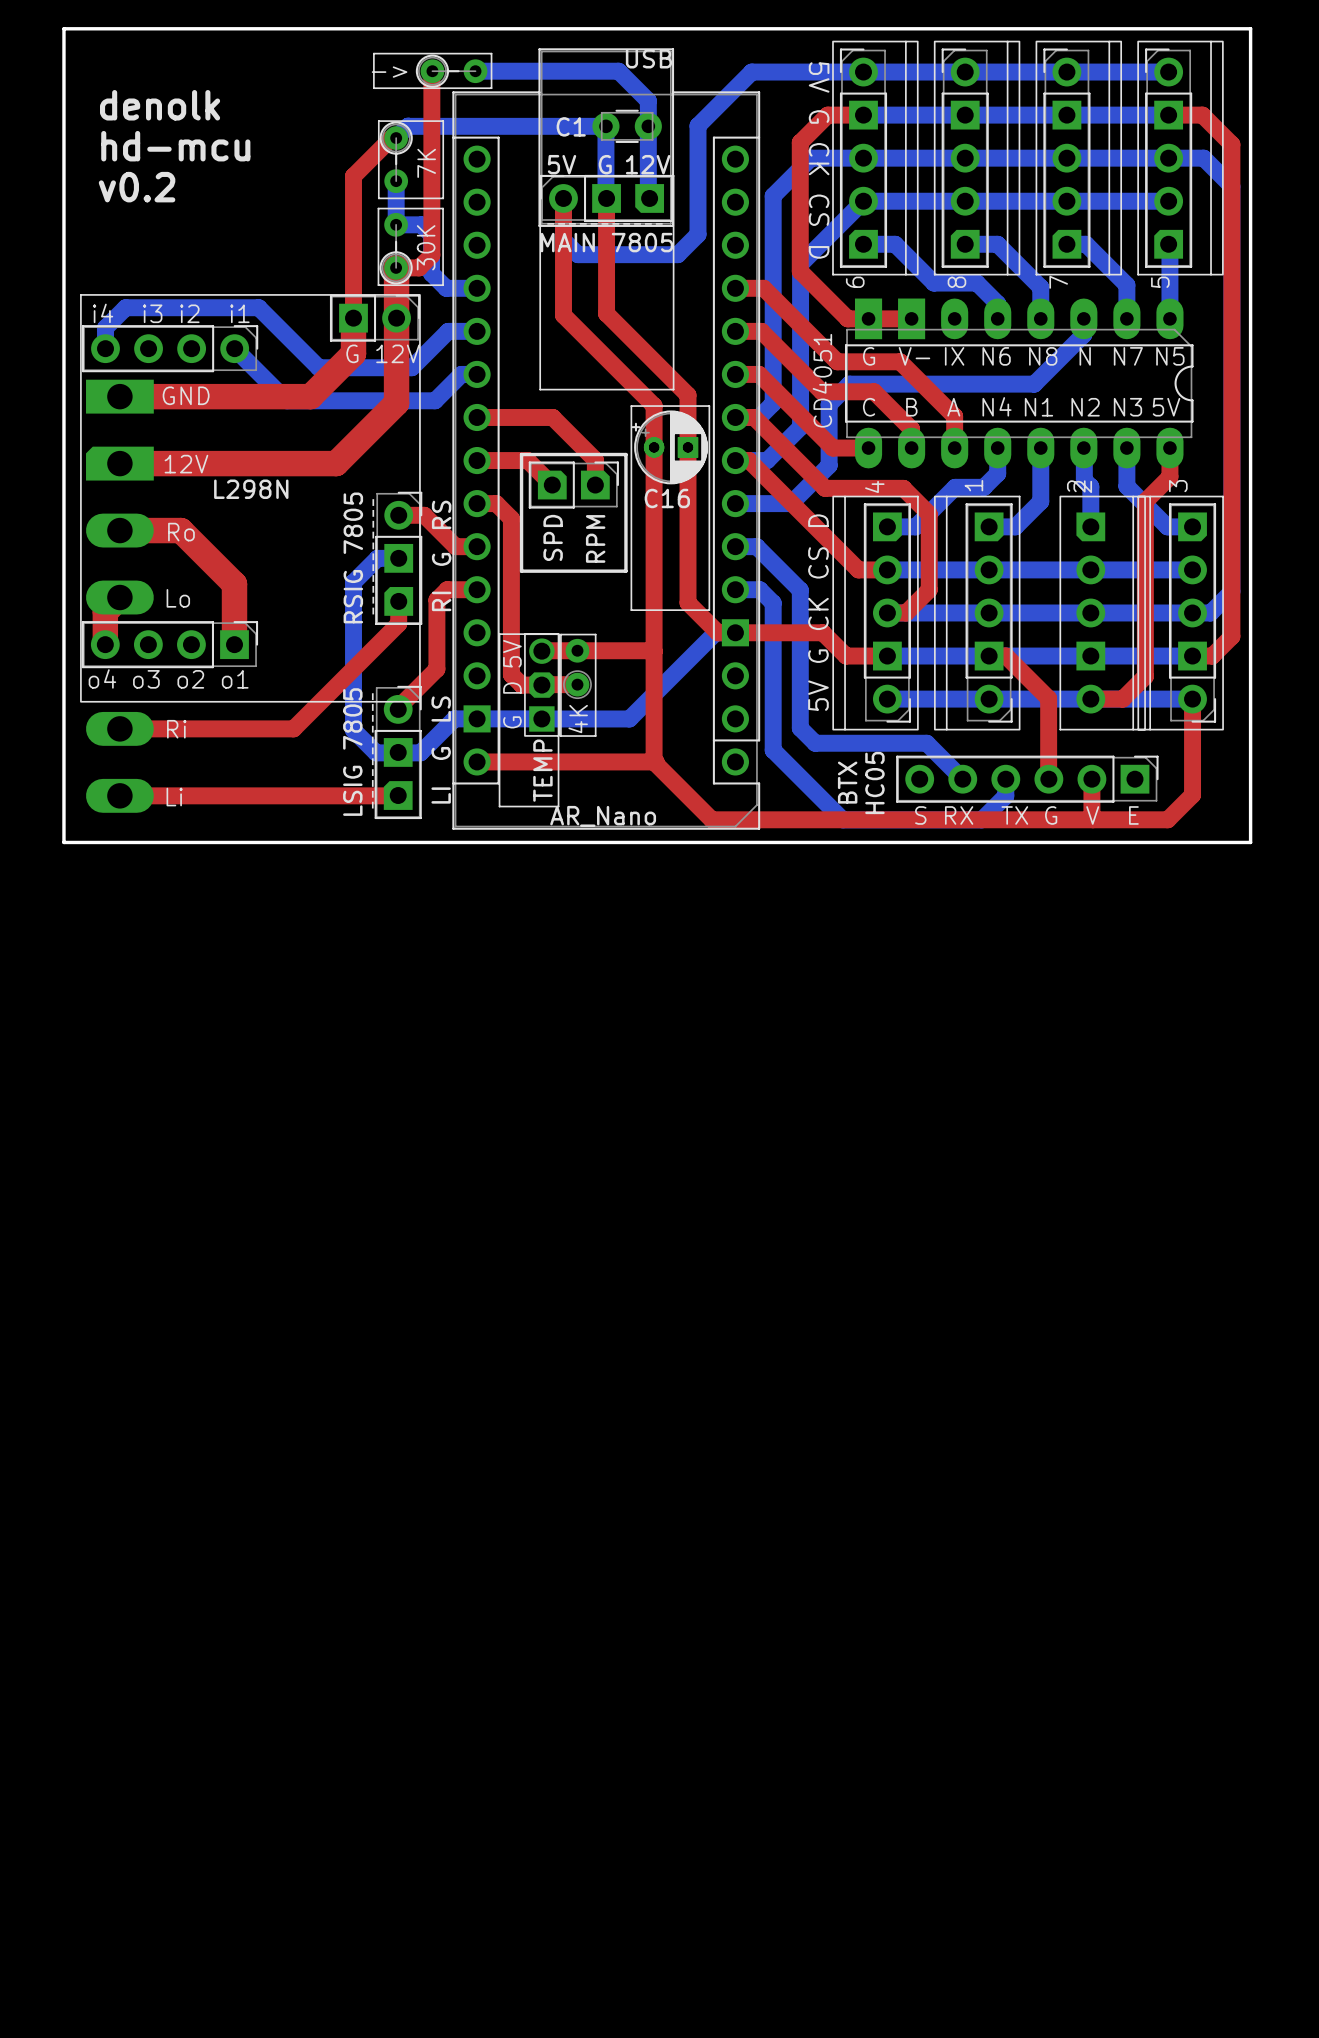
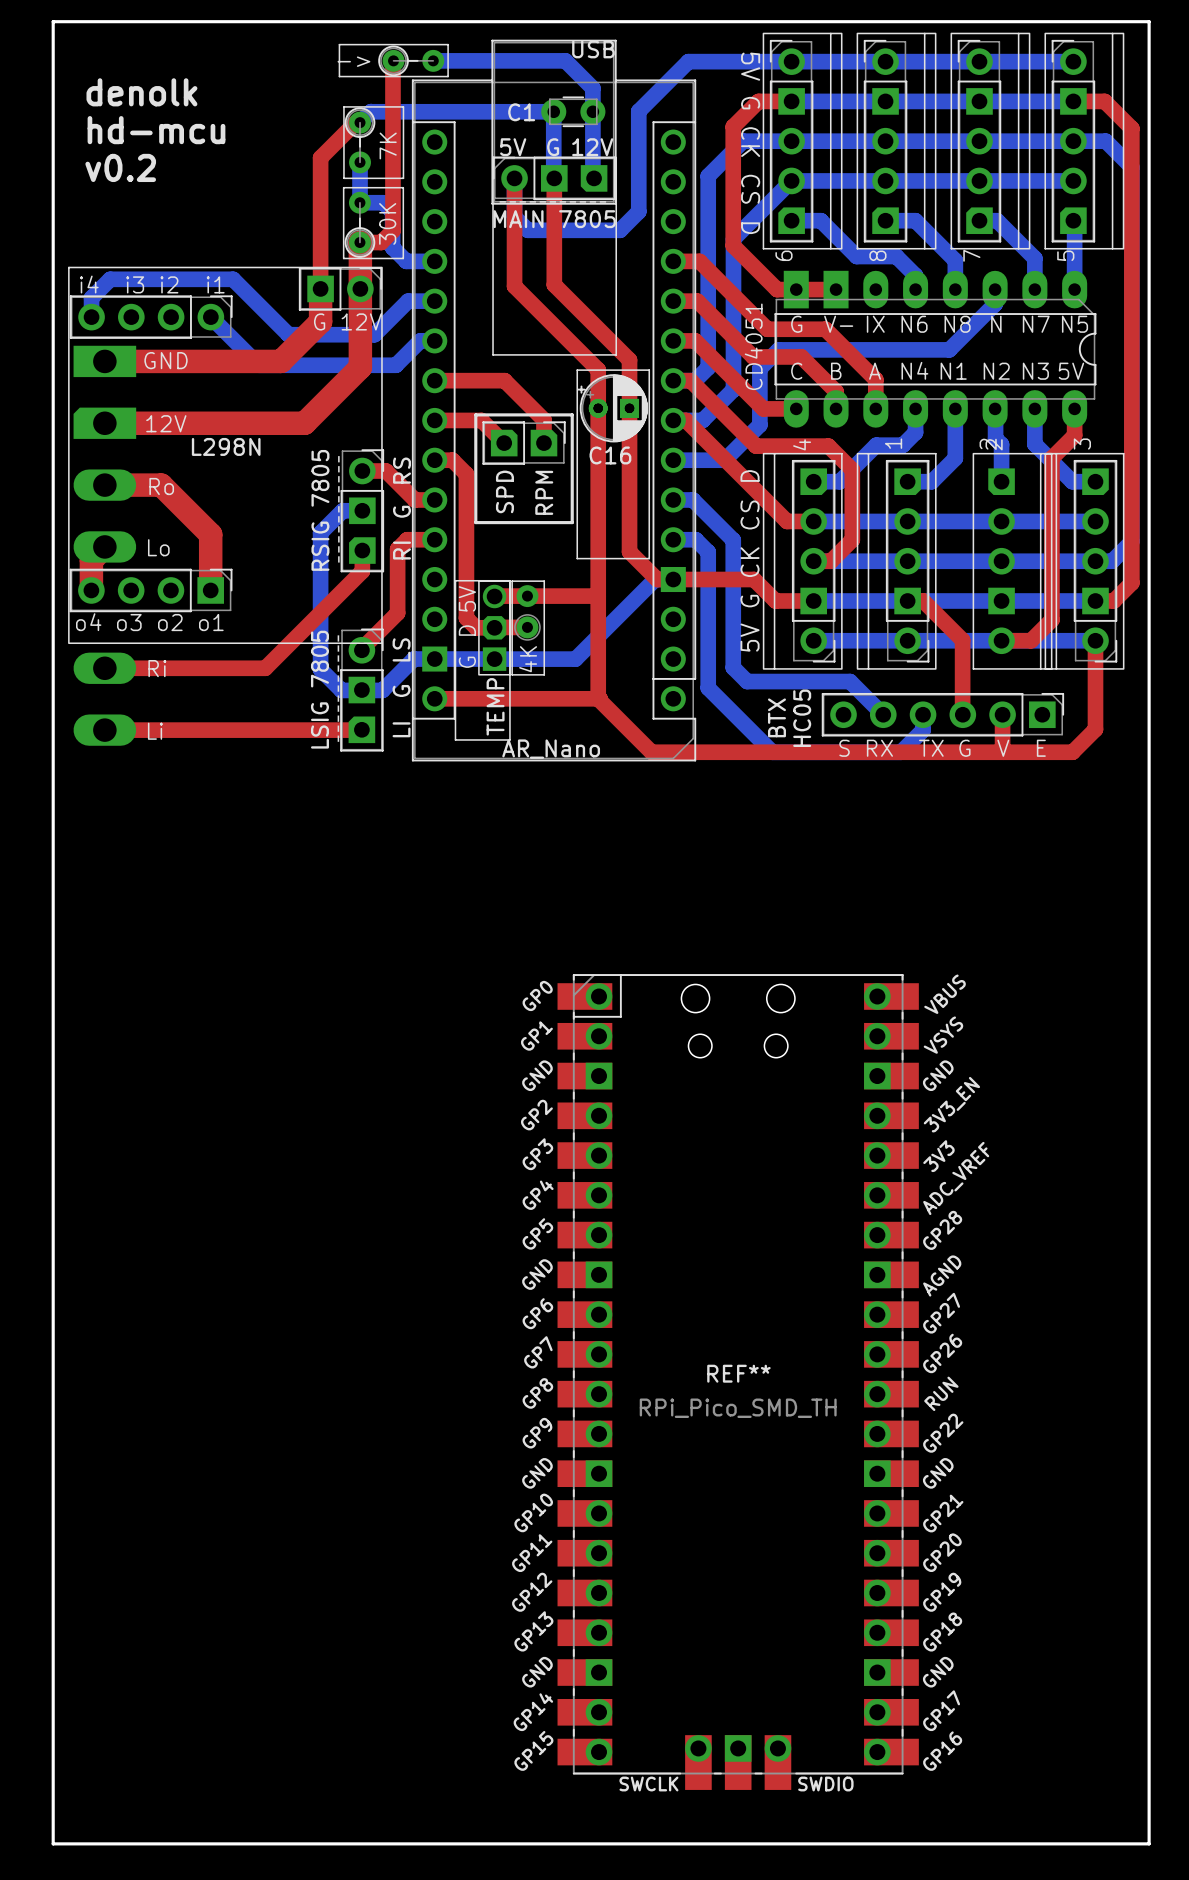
board edge: (63, 842) (1250, 842) -> (53, 773) (53, 1843) (1149, 1843) (1149, 773)
REF**: none -> RPi_Pico_SMD_TH (738, 1382)

